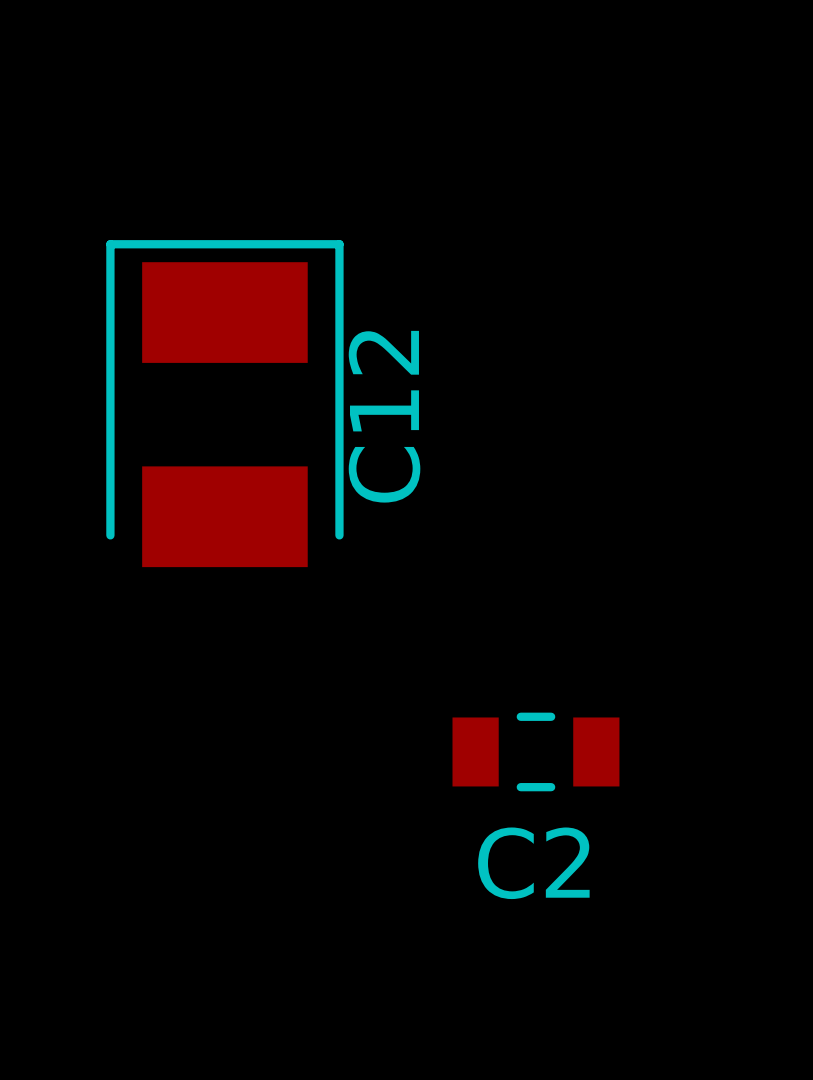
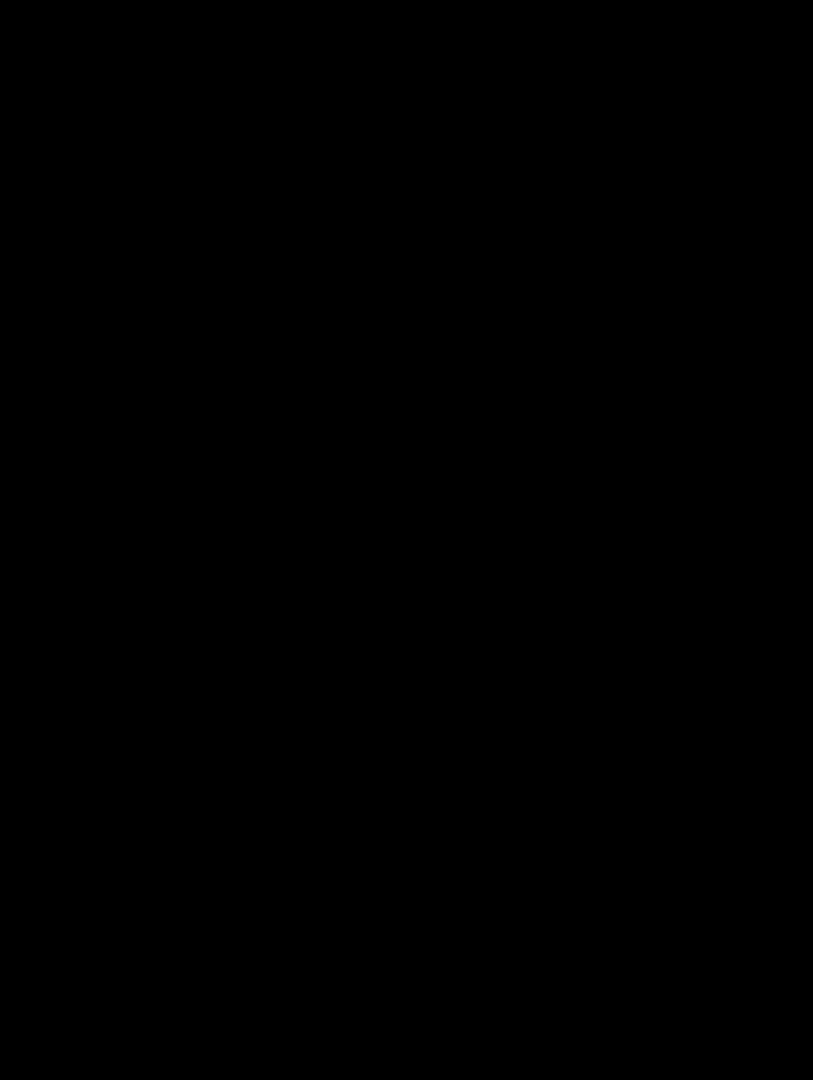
C12: (224, 403) -> none
C2: (535, 751) -> none

